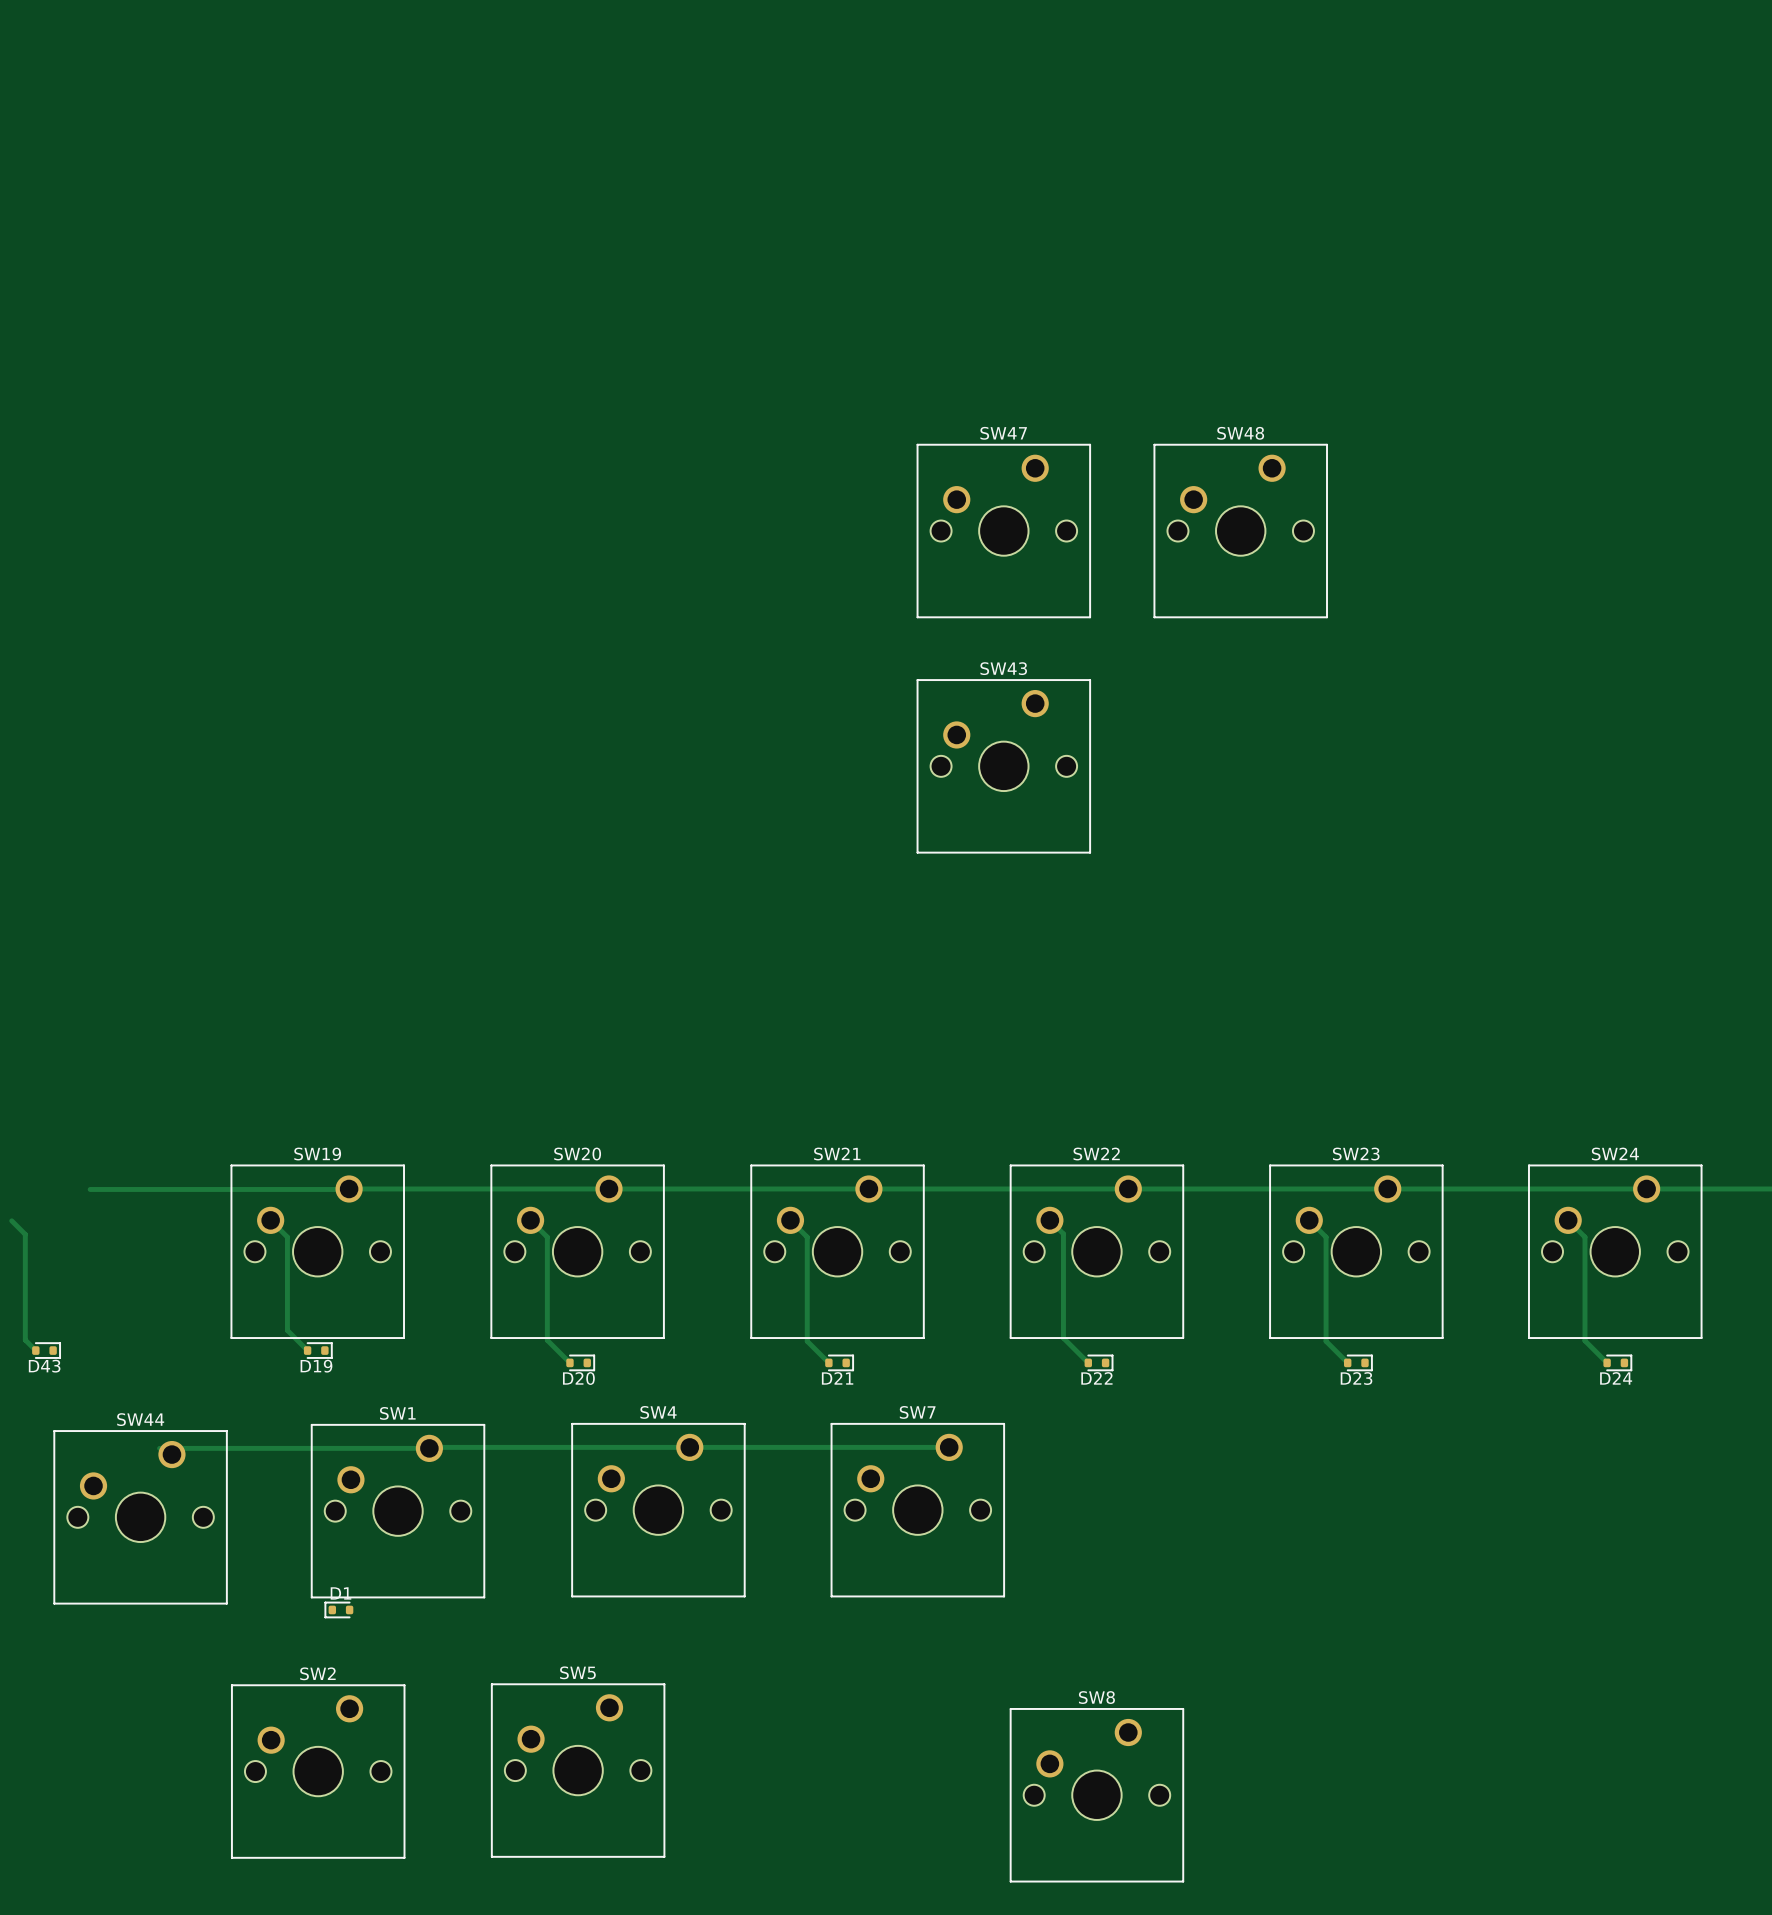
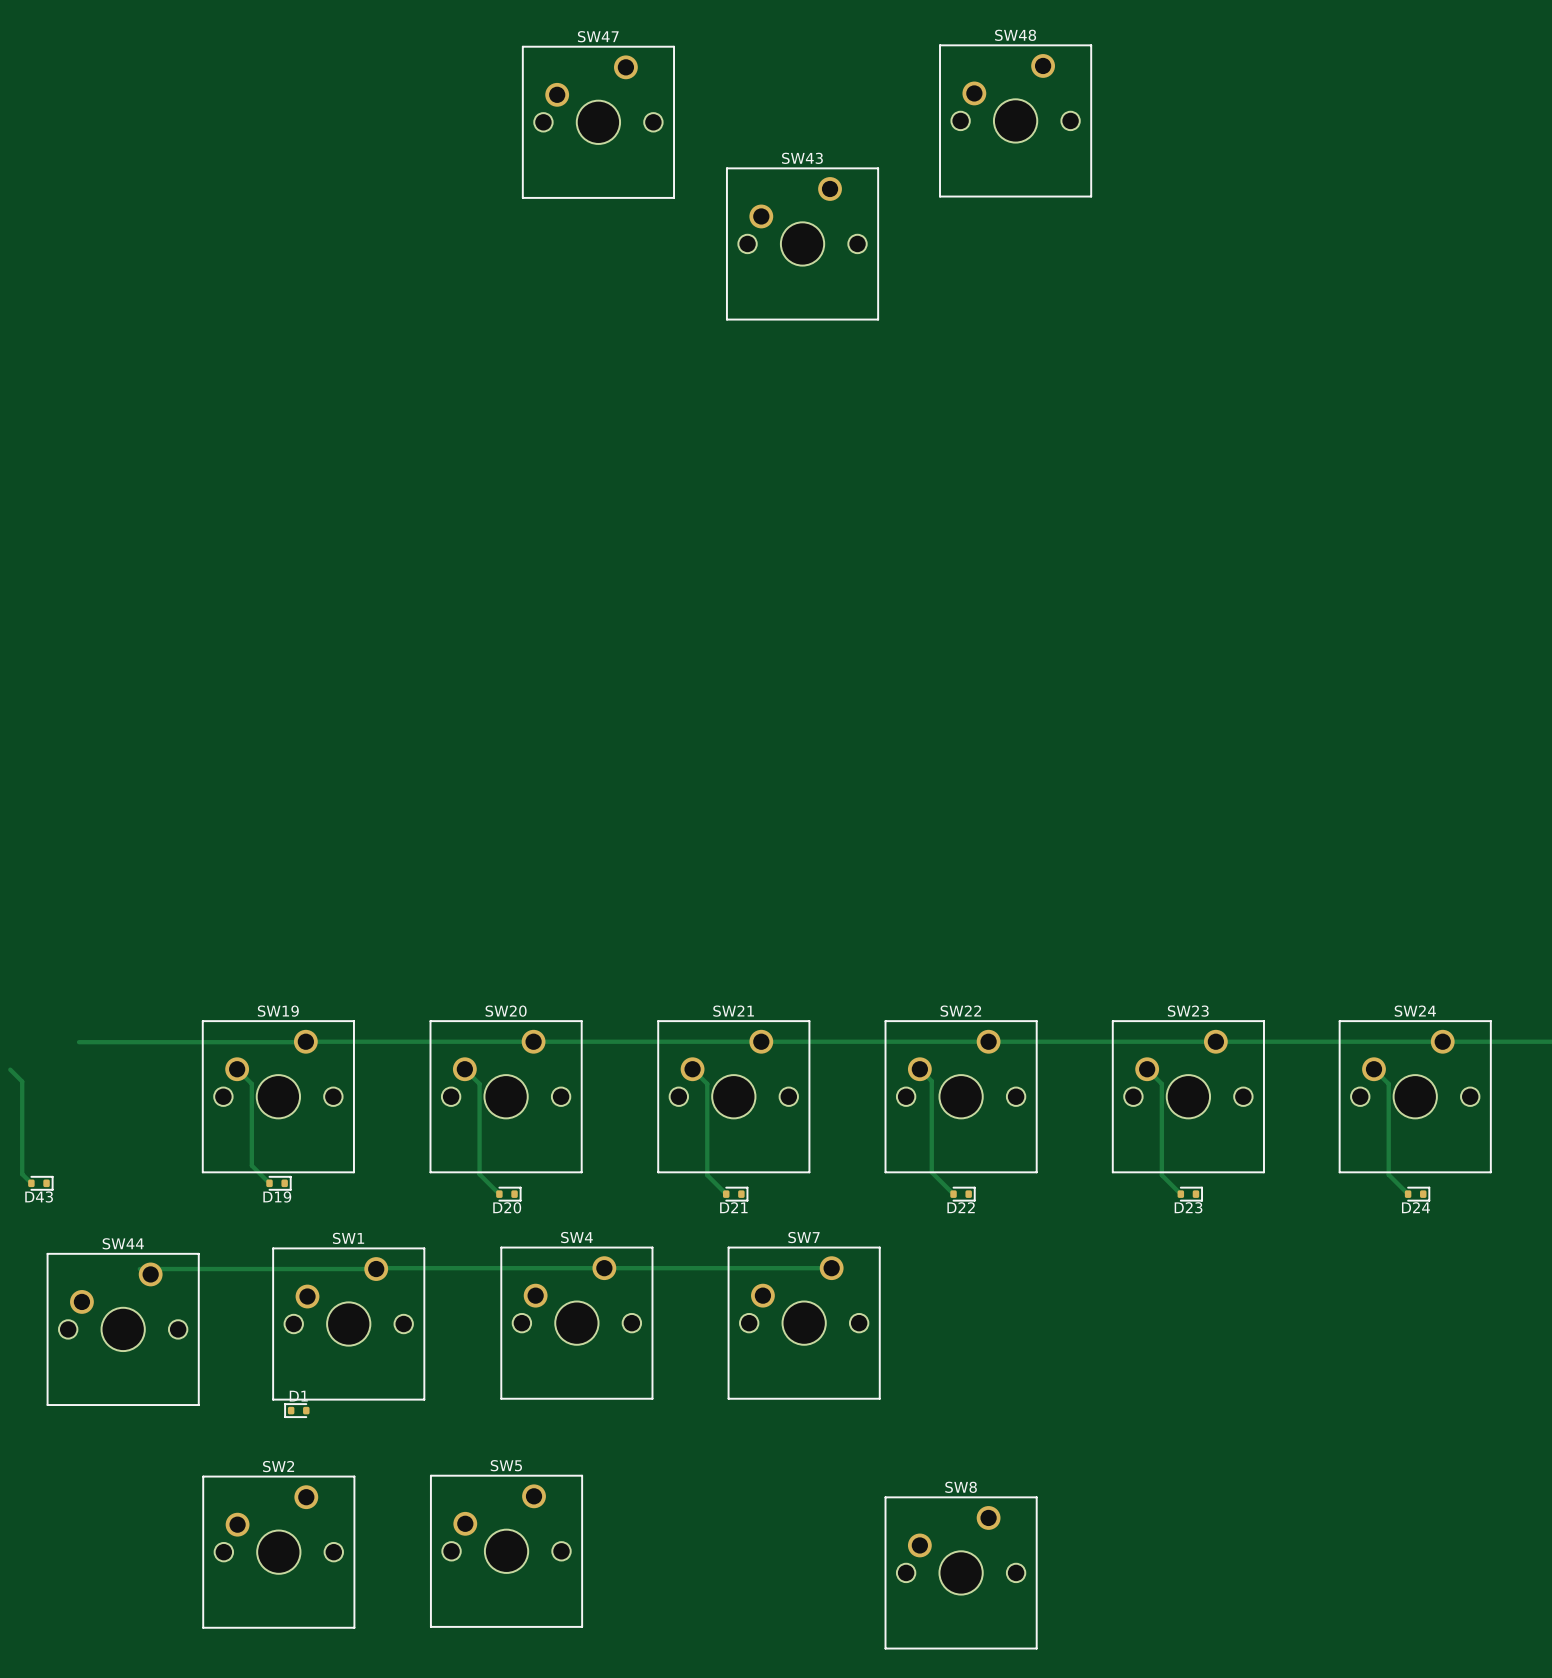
SW47 position: (1003, 531) -> (598, 122)
SW48 position: (1240, 531) -> (1015, 120)
SW43 position: (1003, 766) -> (802, 243)

